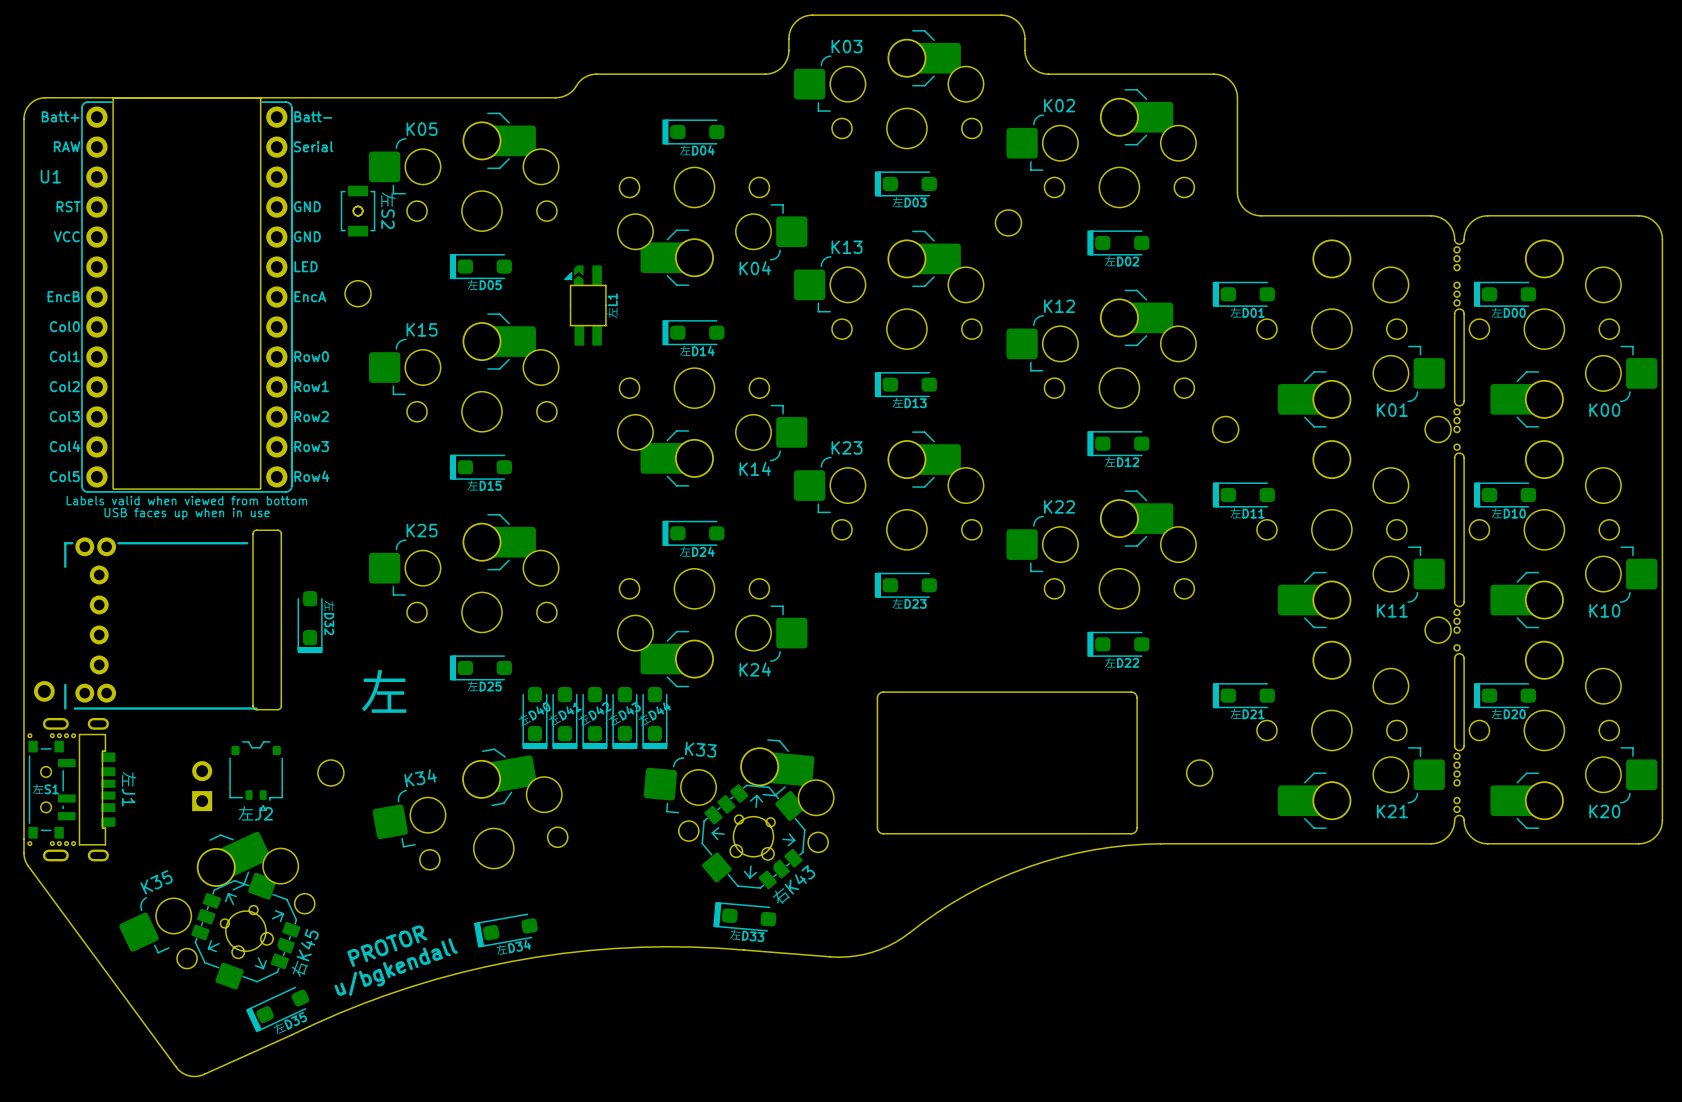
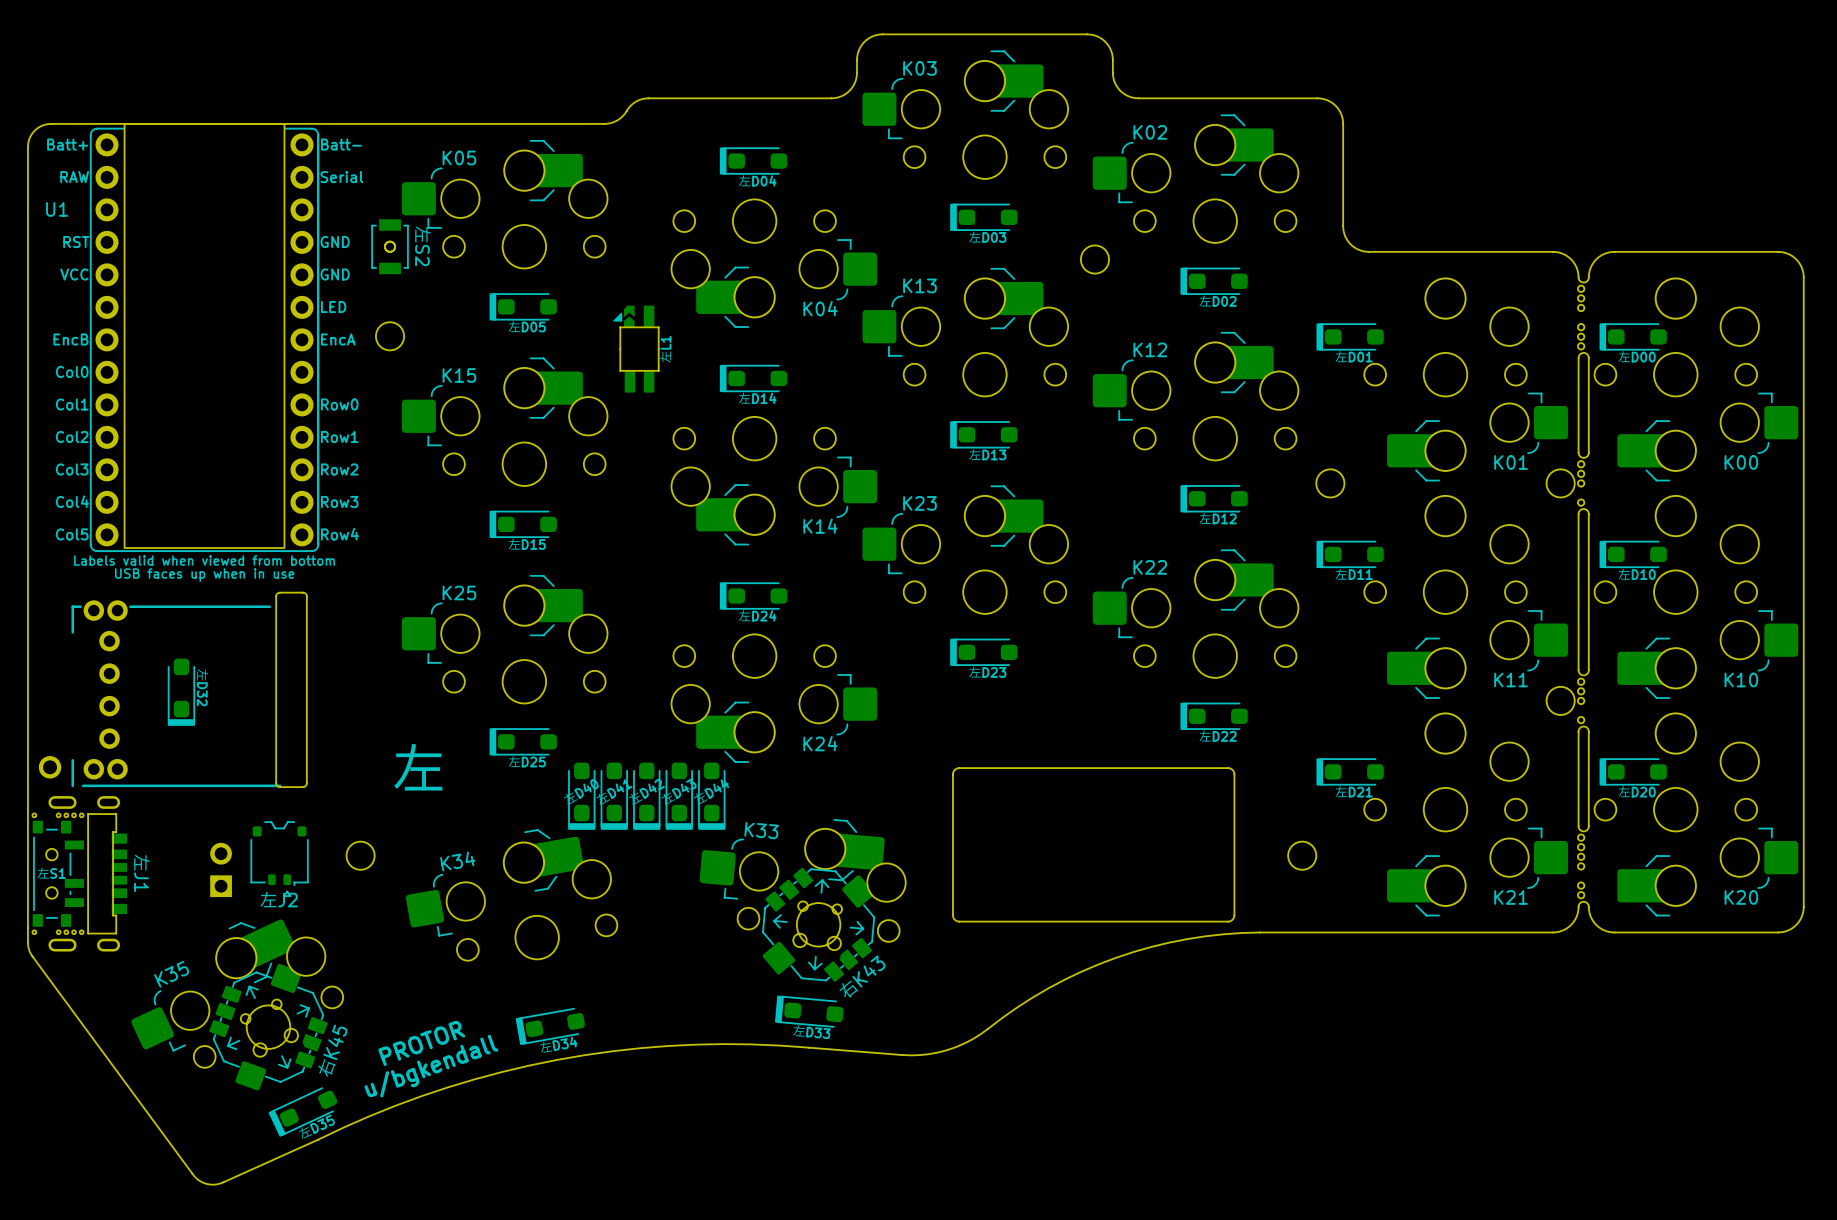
左D32 position: (310, 622) -> (181, 692)

